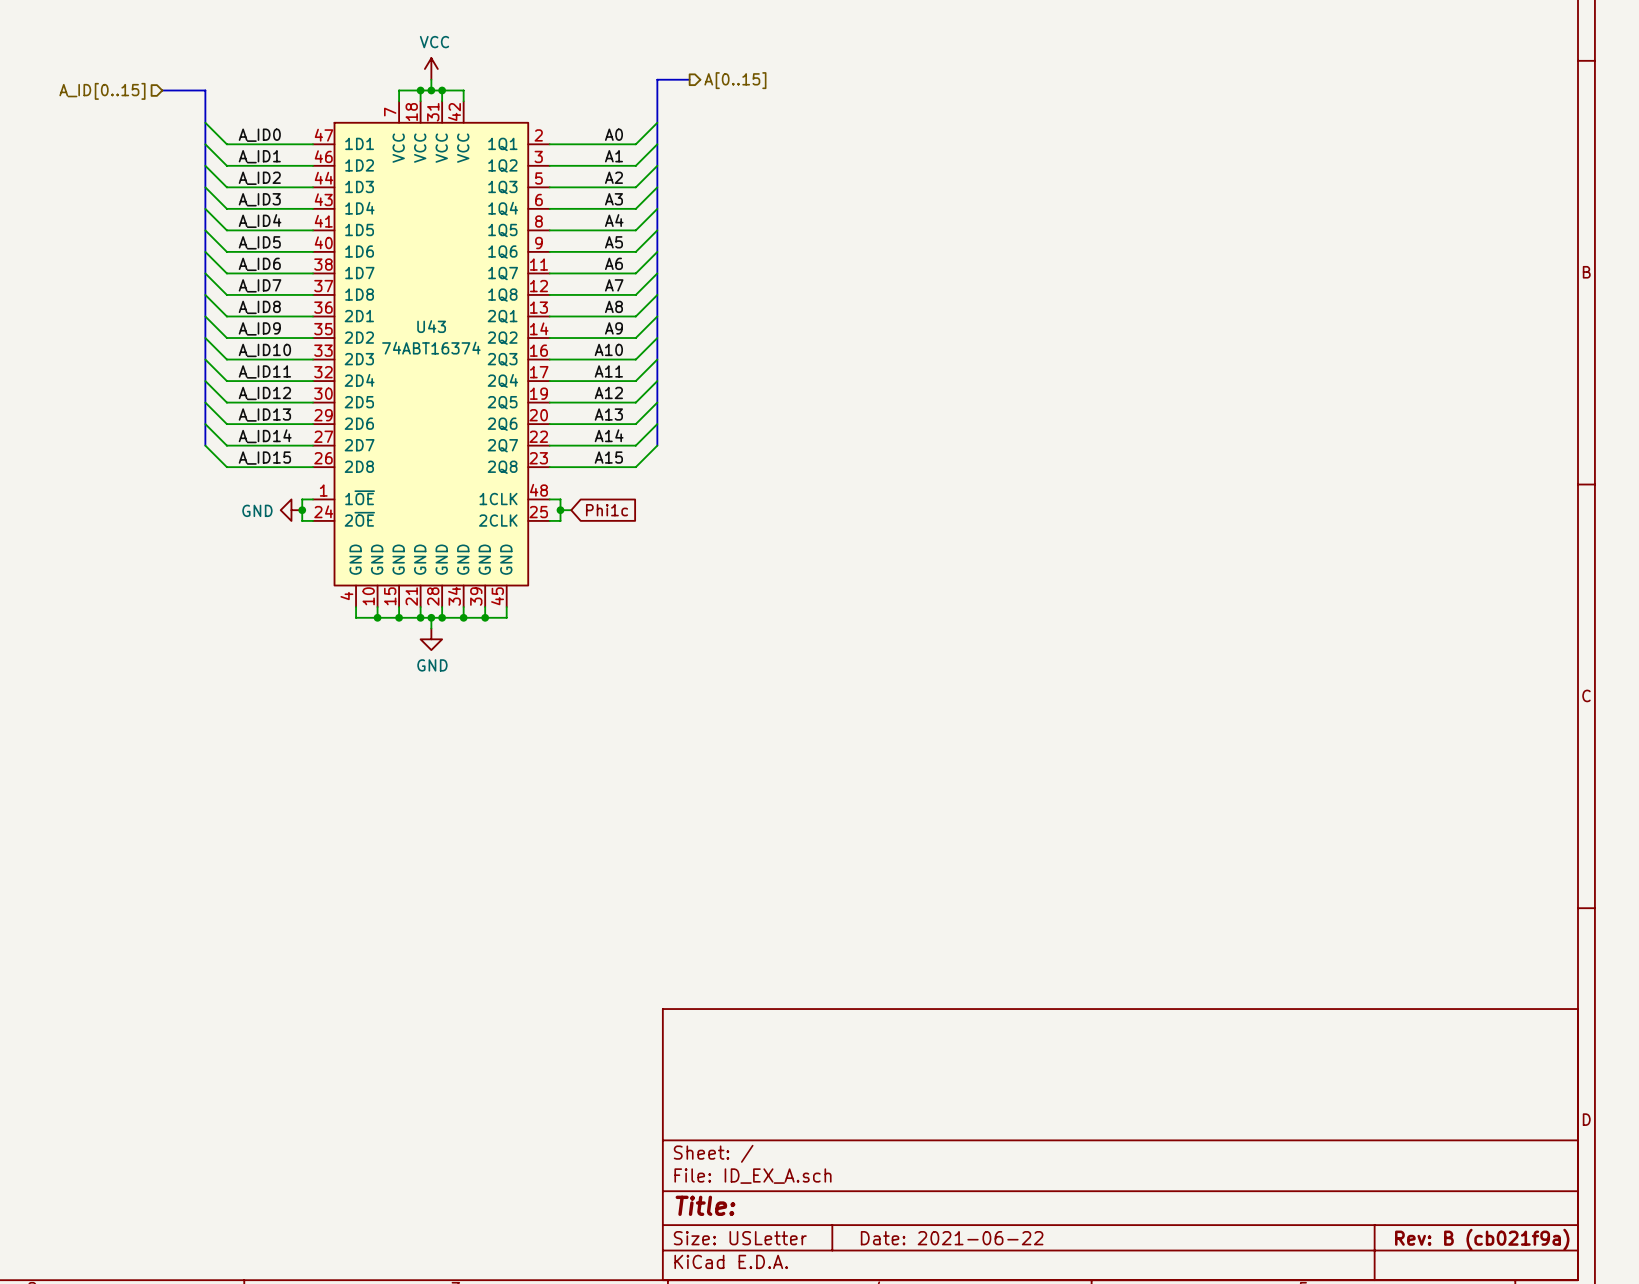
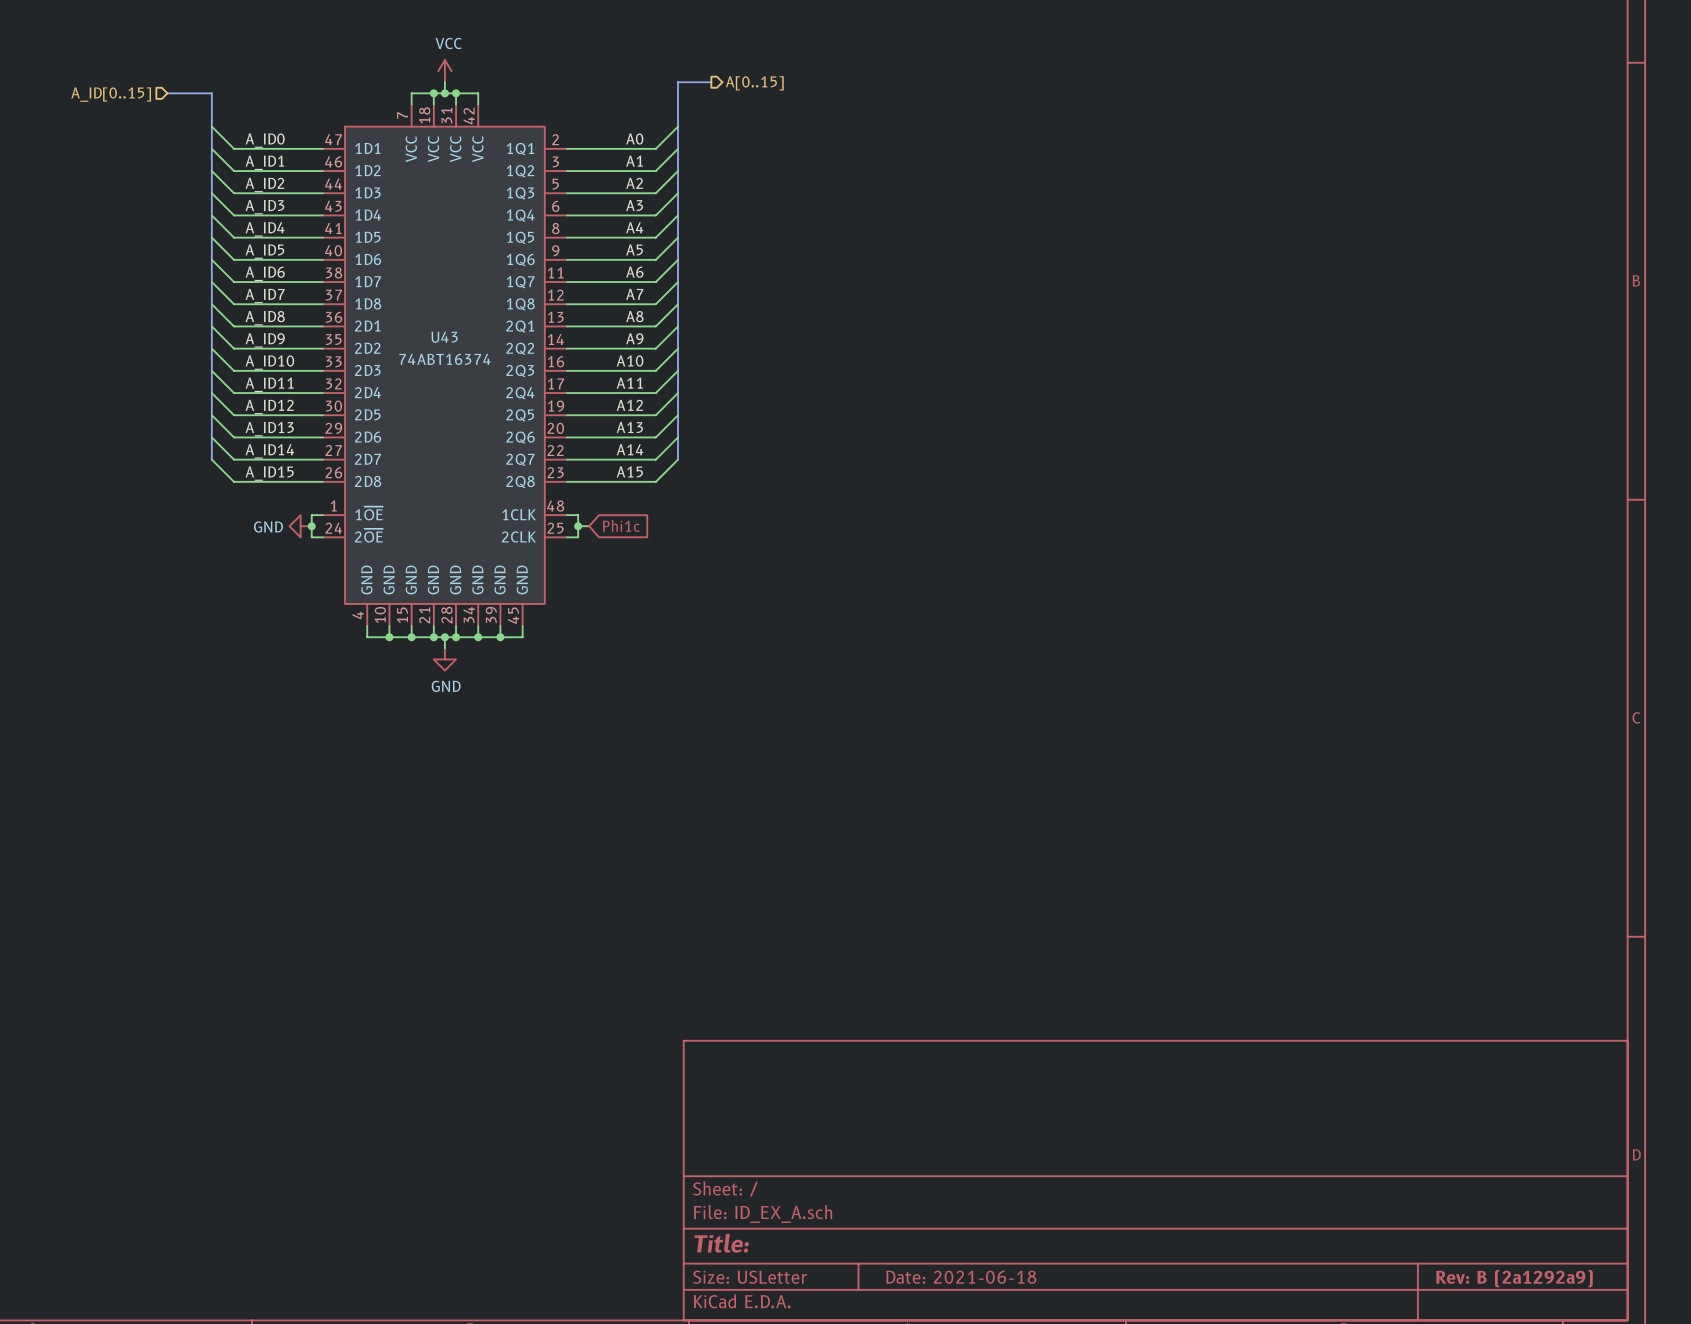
title block: Date: 2021-06-22 (952, 1238) -> Date: 2021-06-18 (961, 1277)
title block: Rev: B (cb021f9a) (1482, 1239) -> Rev: B (2a1292a9) (1514, 1278)

